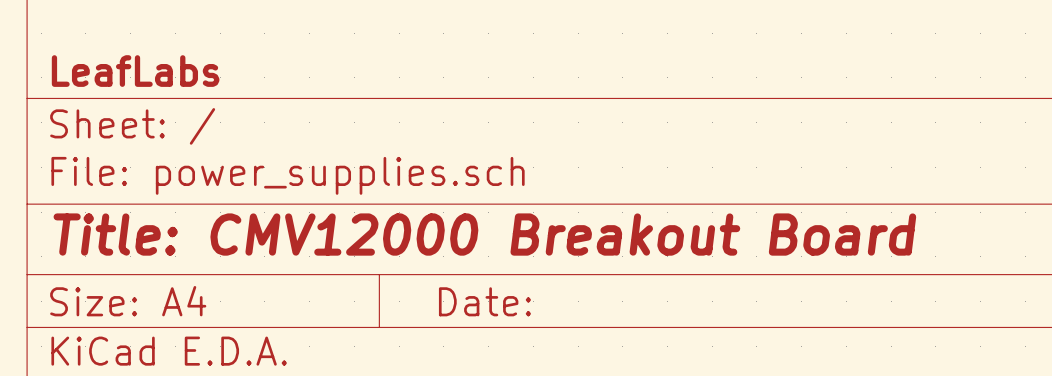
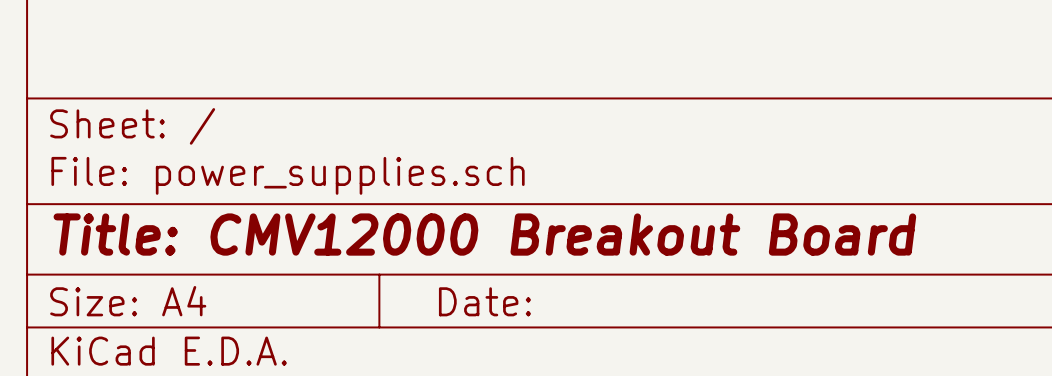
title block: LeafLabs (135, 71) -> none

